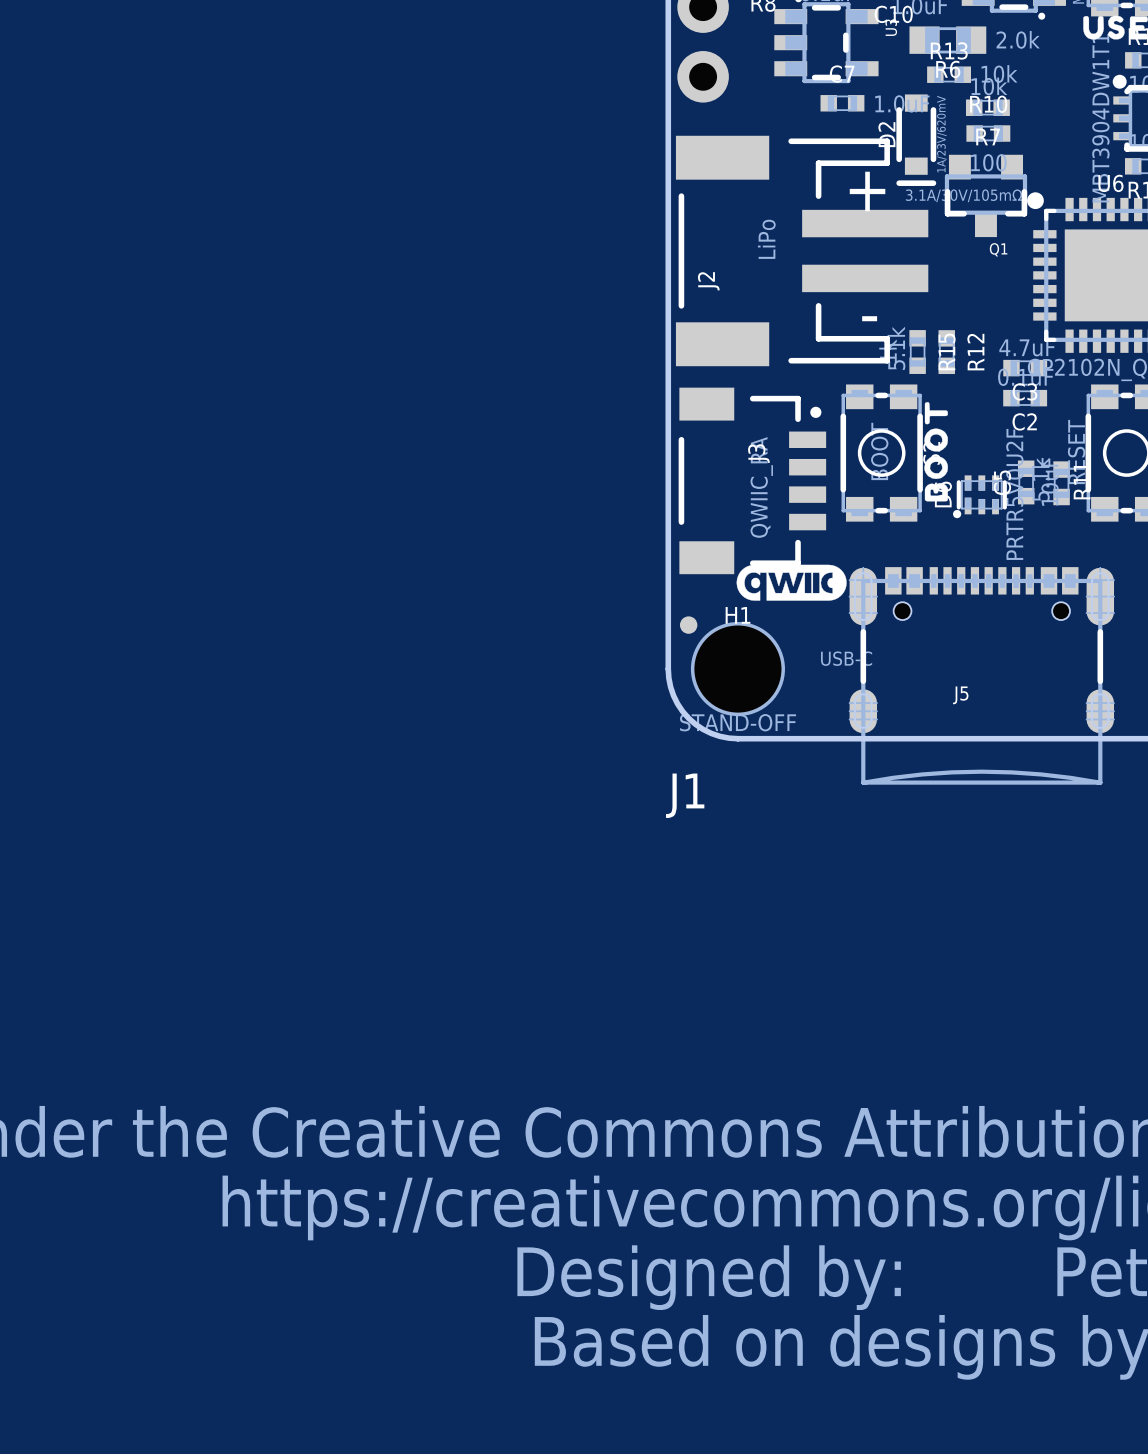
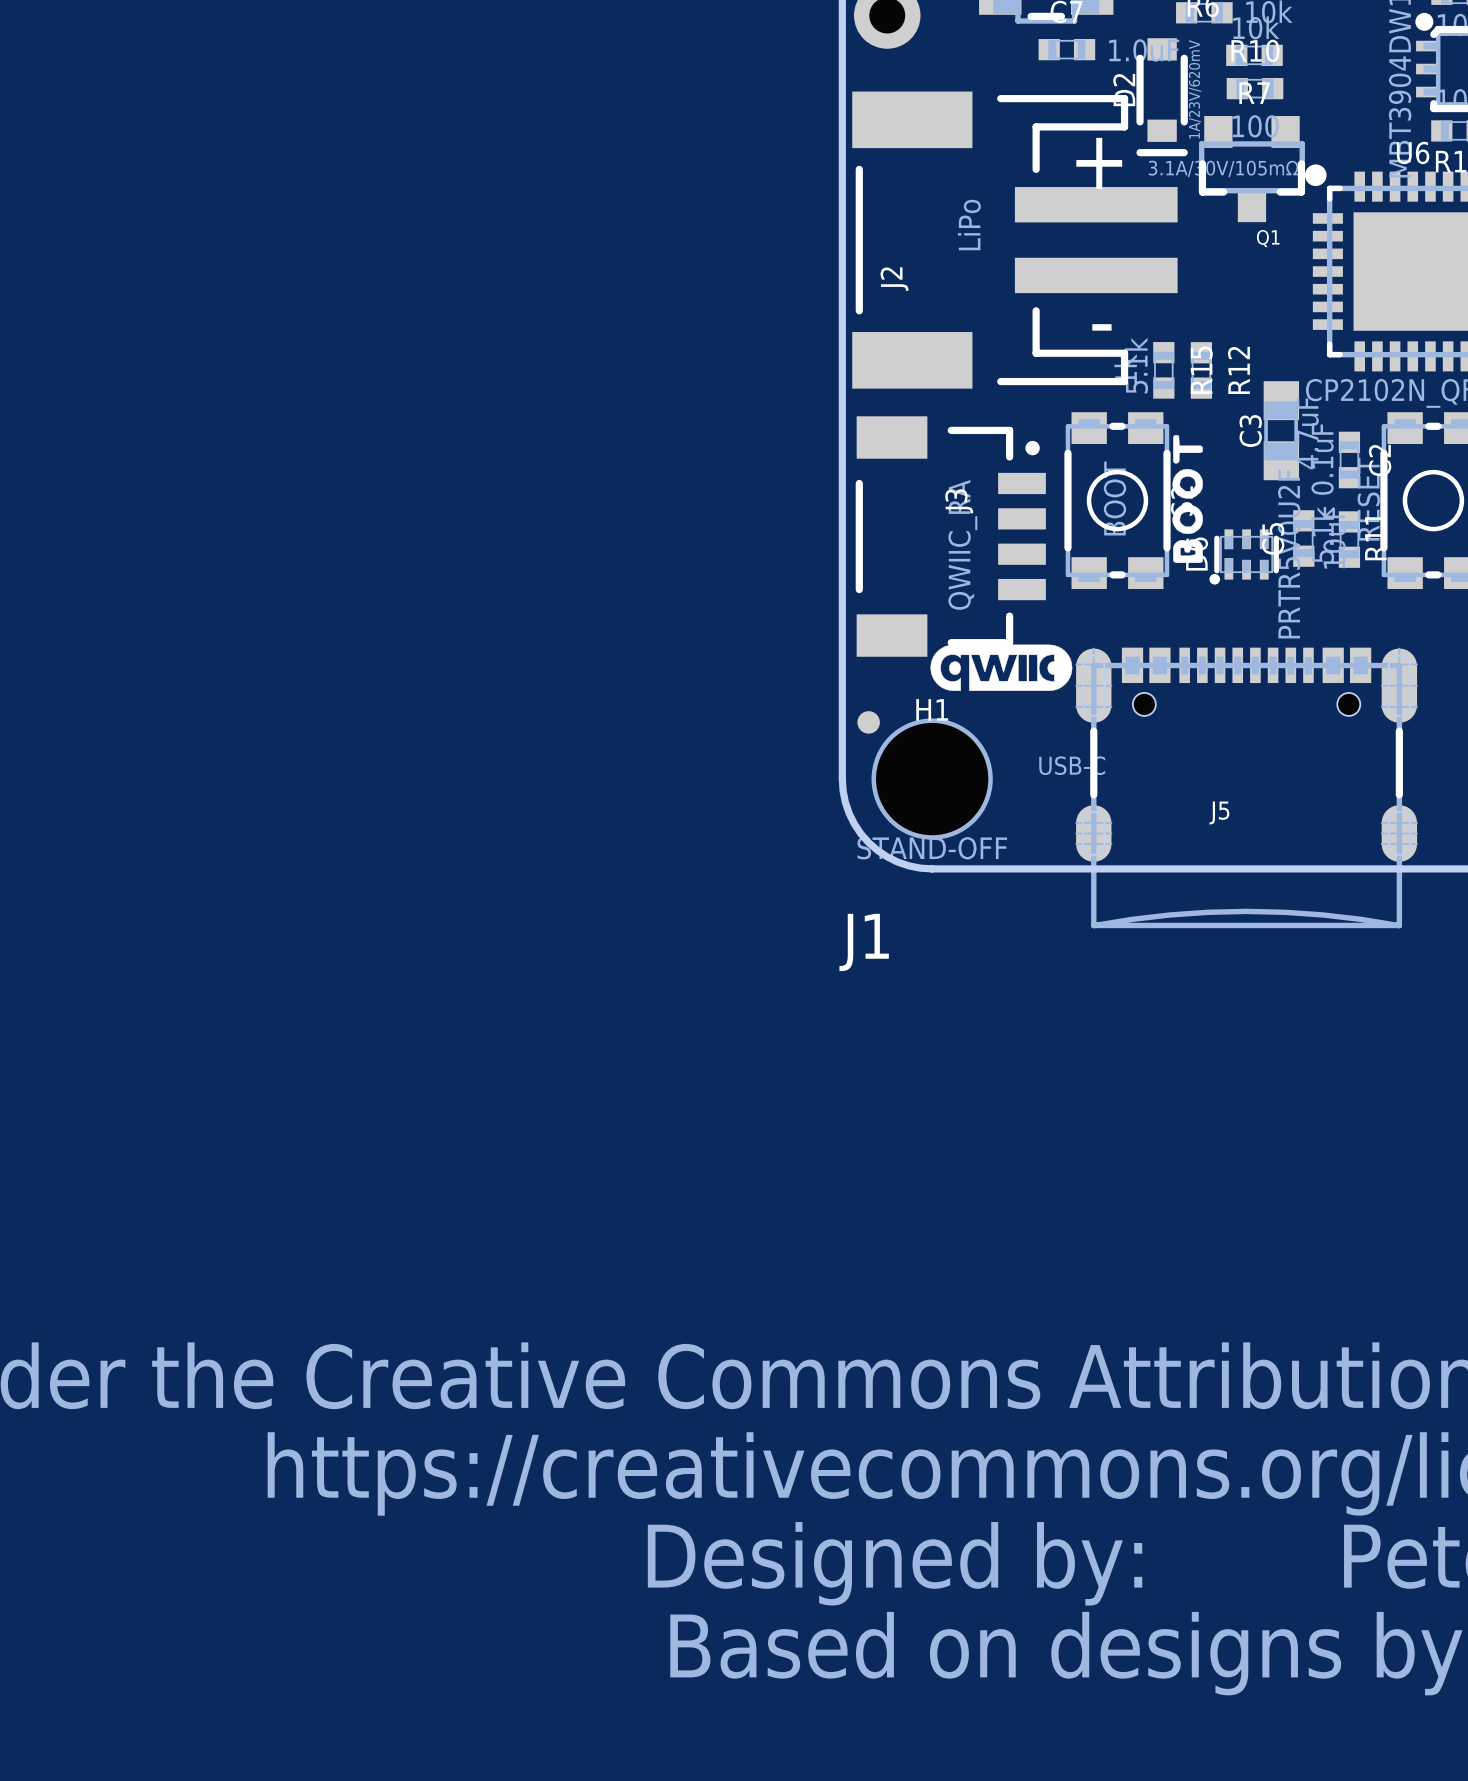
C3 footprint: [1003, 359, 1048, 377] -> [1263, 381, 1300, 481]
C2 rotation: 0° (1025, 398) -> 90° clockwise (1349, 459)
C2 position: (1025, 398) -> (1349, 459)

